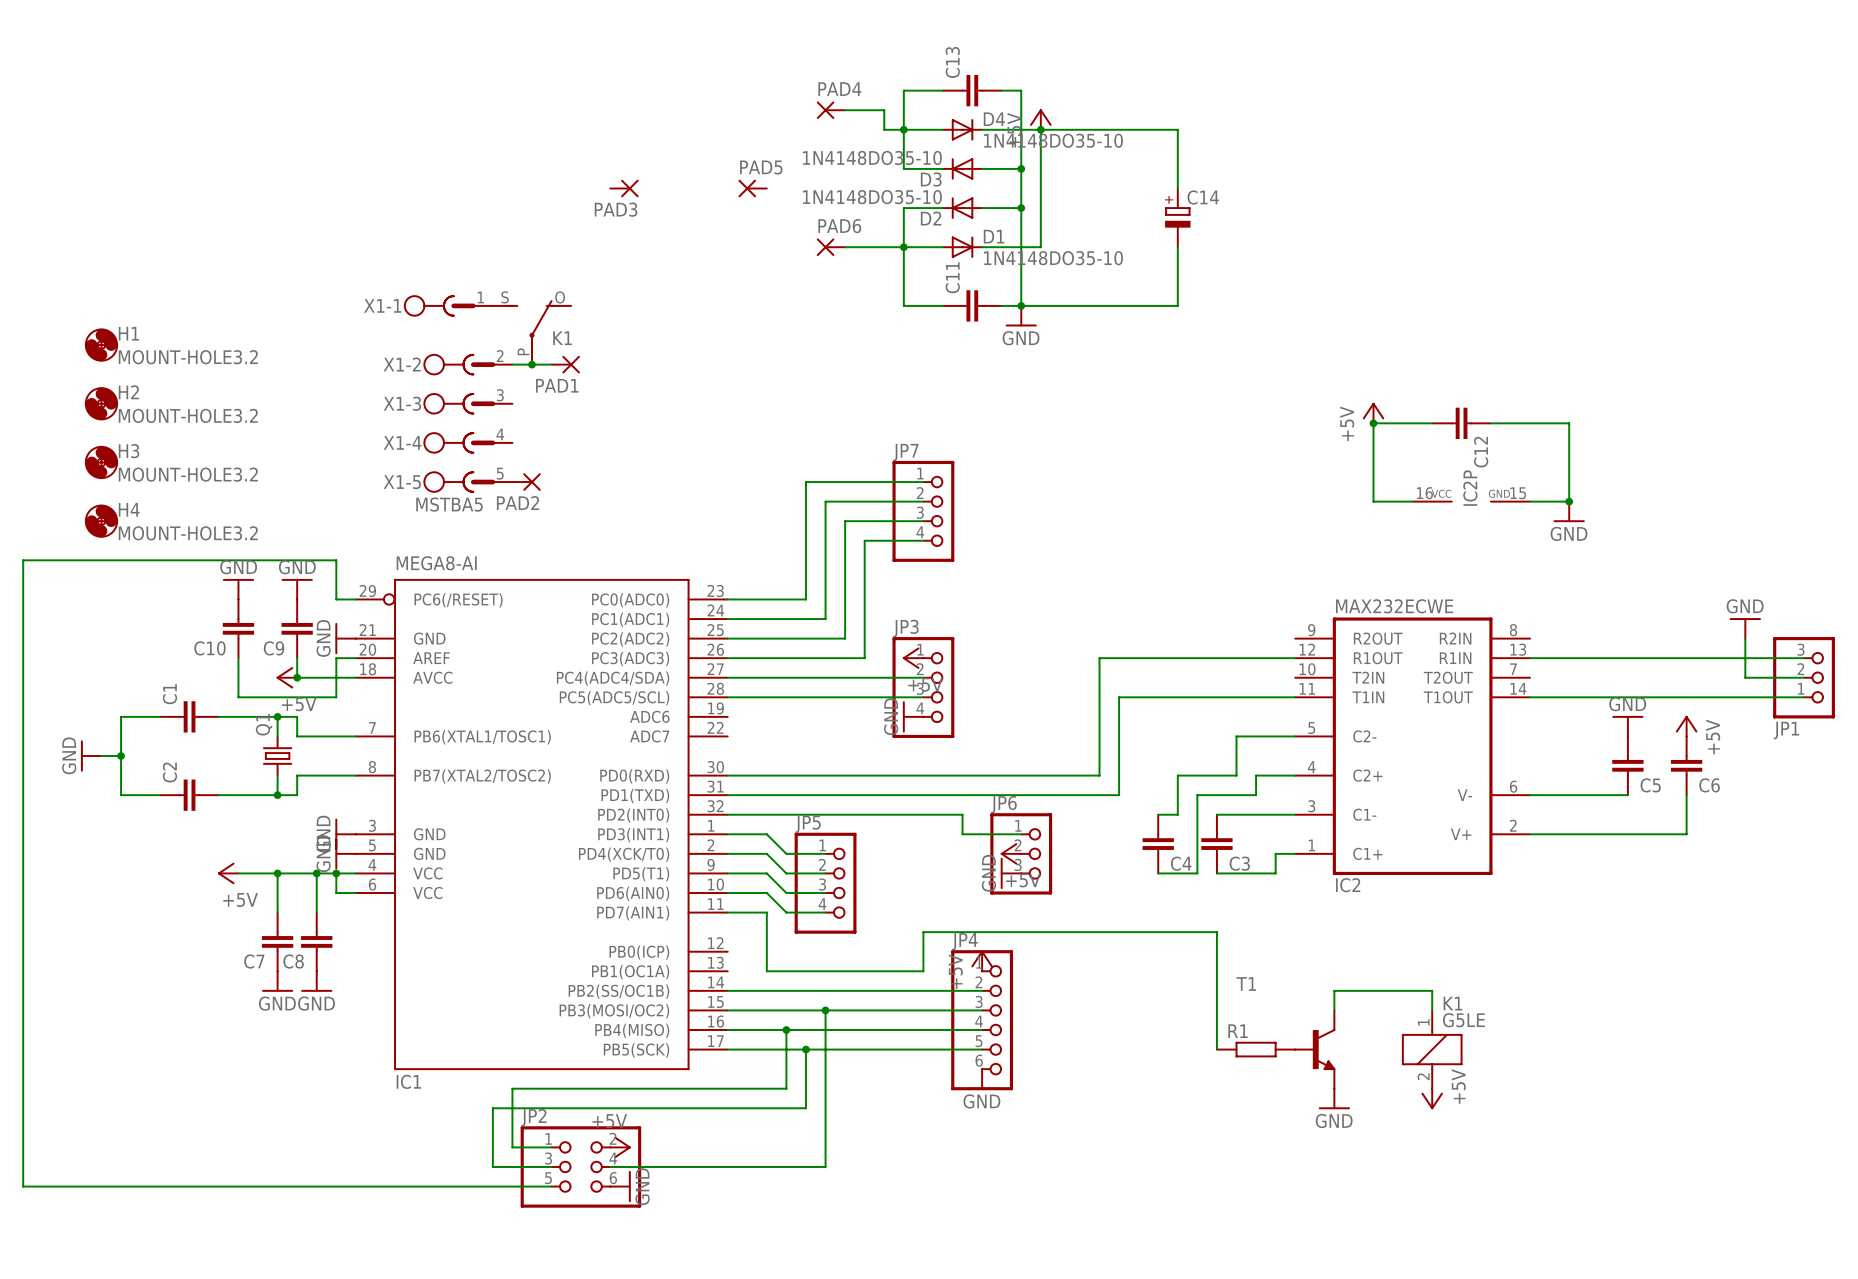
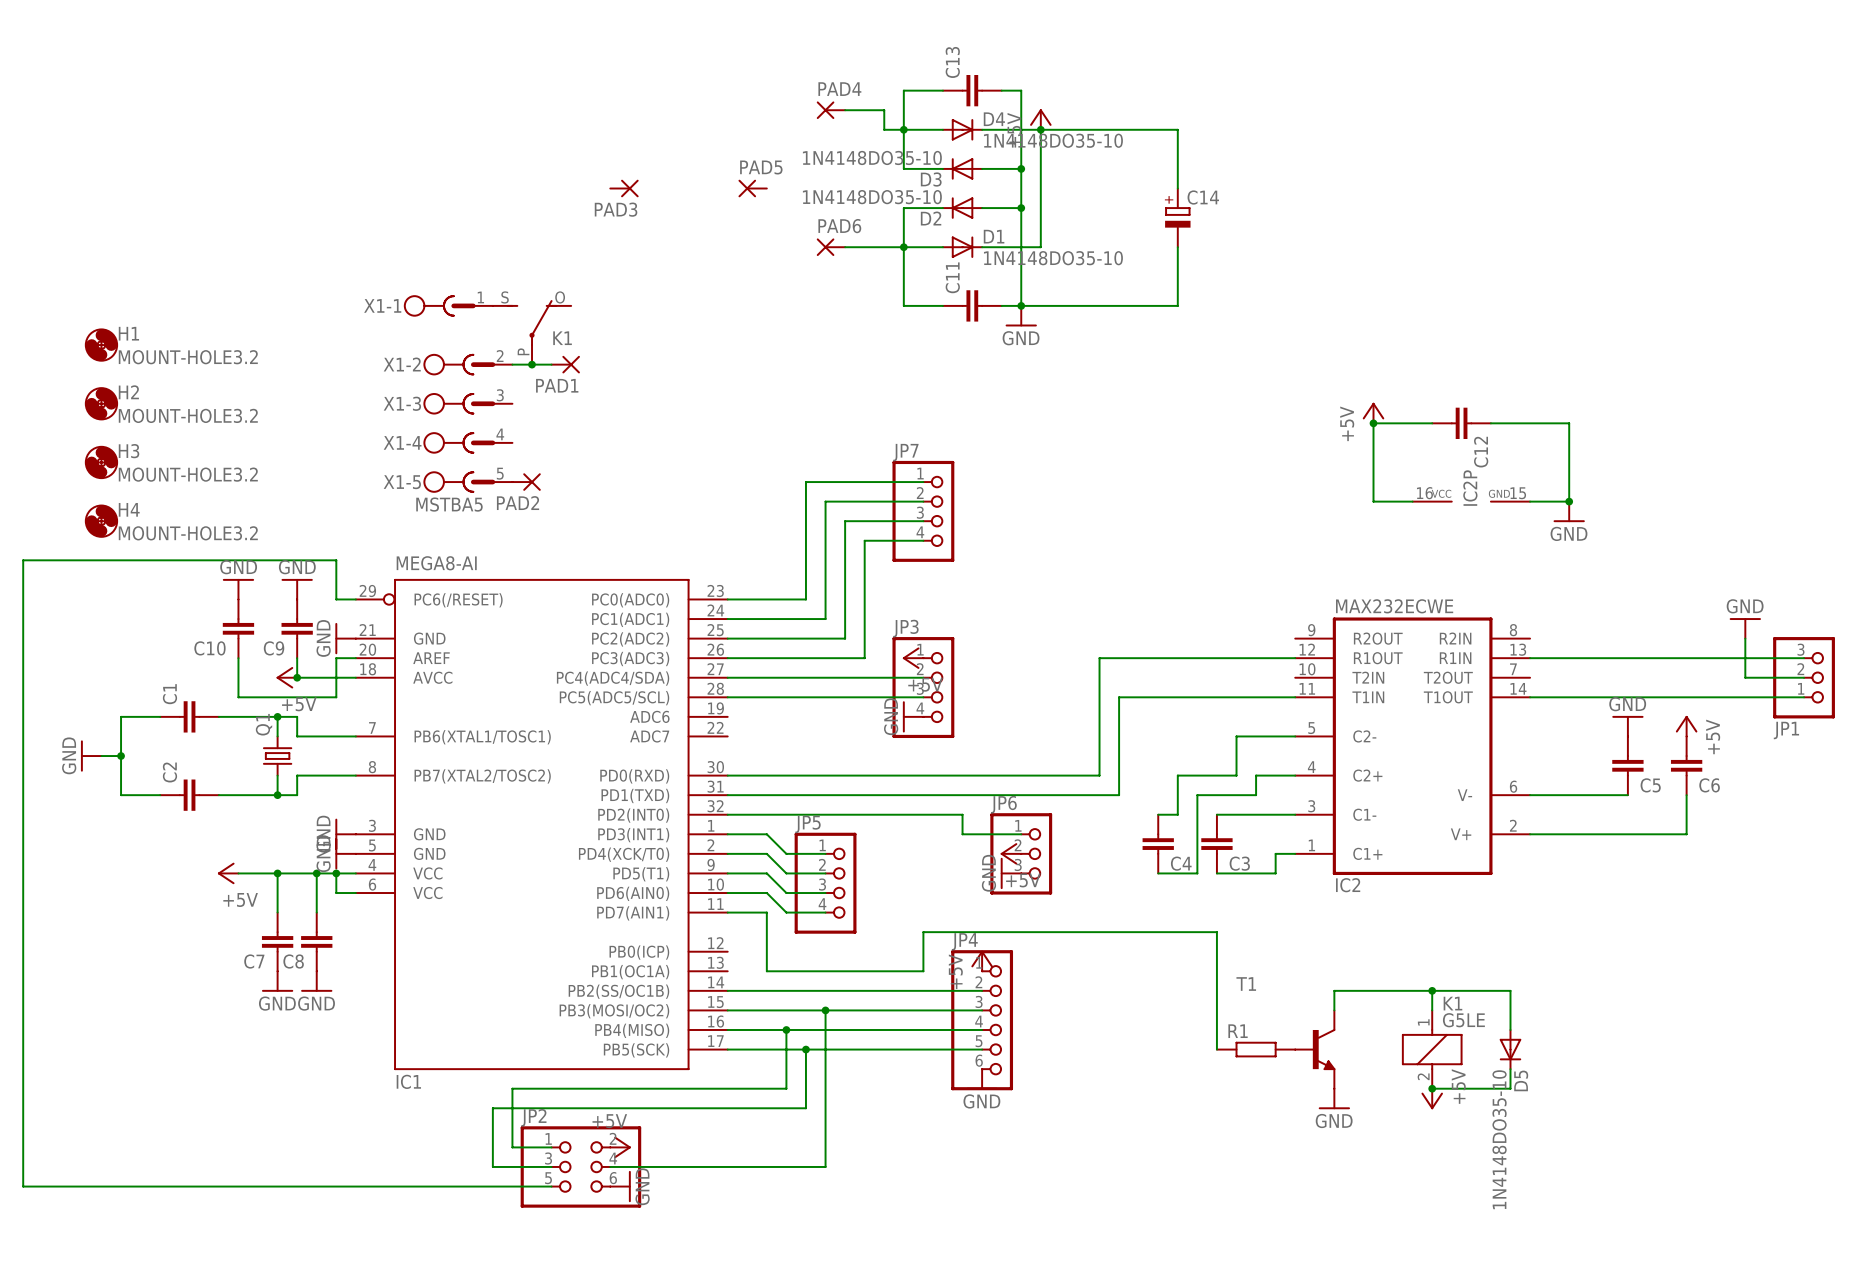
wire: none -> (1432, 990) (1510, 990) (1510, 1029)
junction: none -> (1432, 990)
D5: none -> 1N4148DO35-10 (1510, 1049)
wire: none -> (1510, 1069) (1510, 1088) (1432, 1088)
junction: none -> (1432, 1088)

